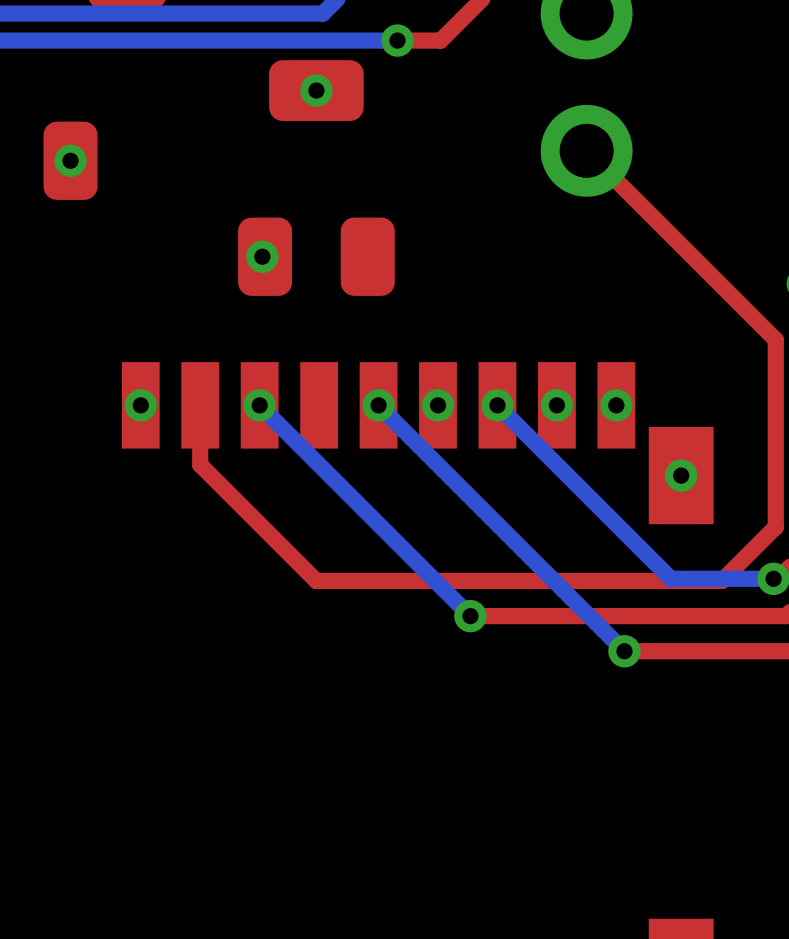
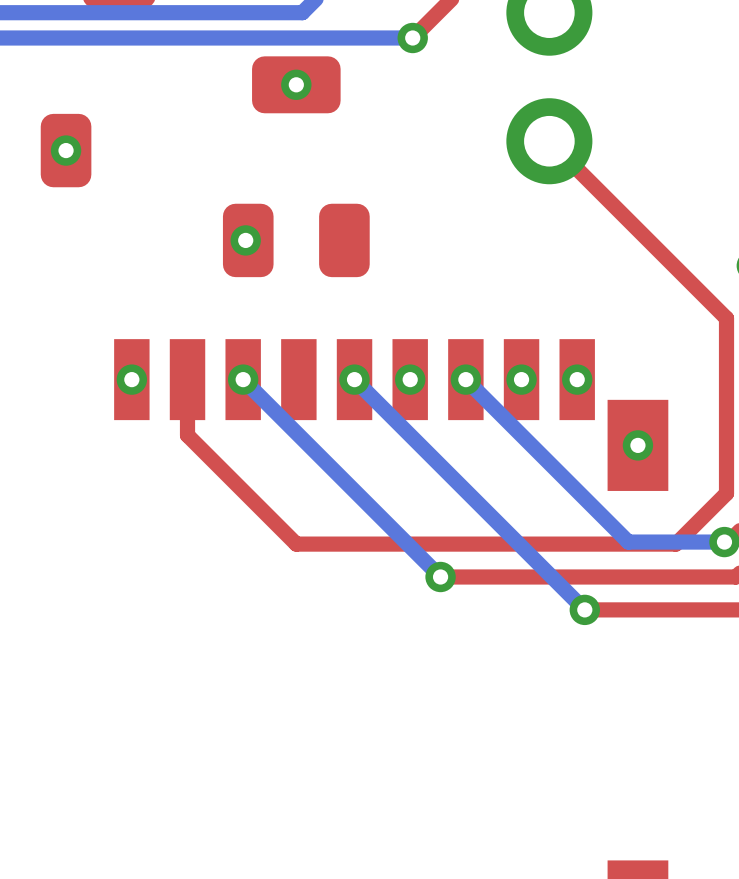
via position: (397, 40) -> (412, 37)
top track: (440, 40) (397, 40) -> none
bottom track: none -> (412, 37) (372, 37)

